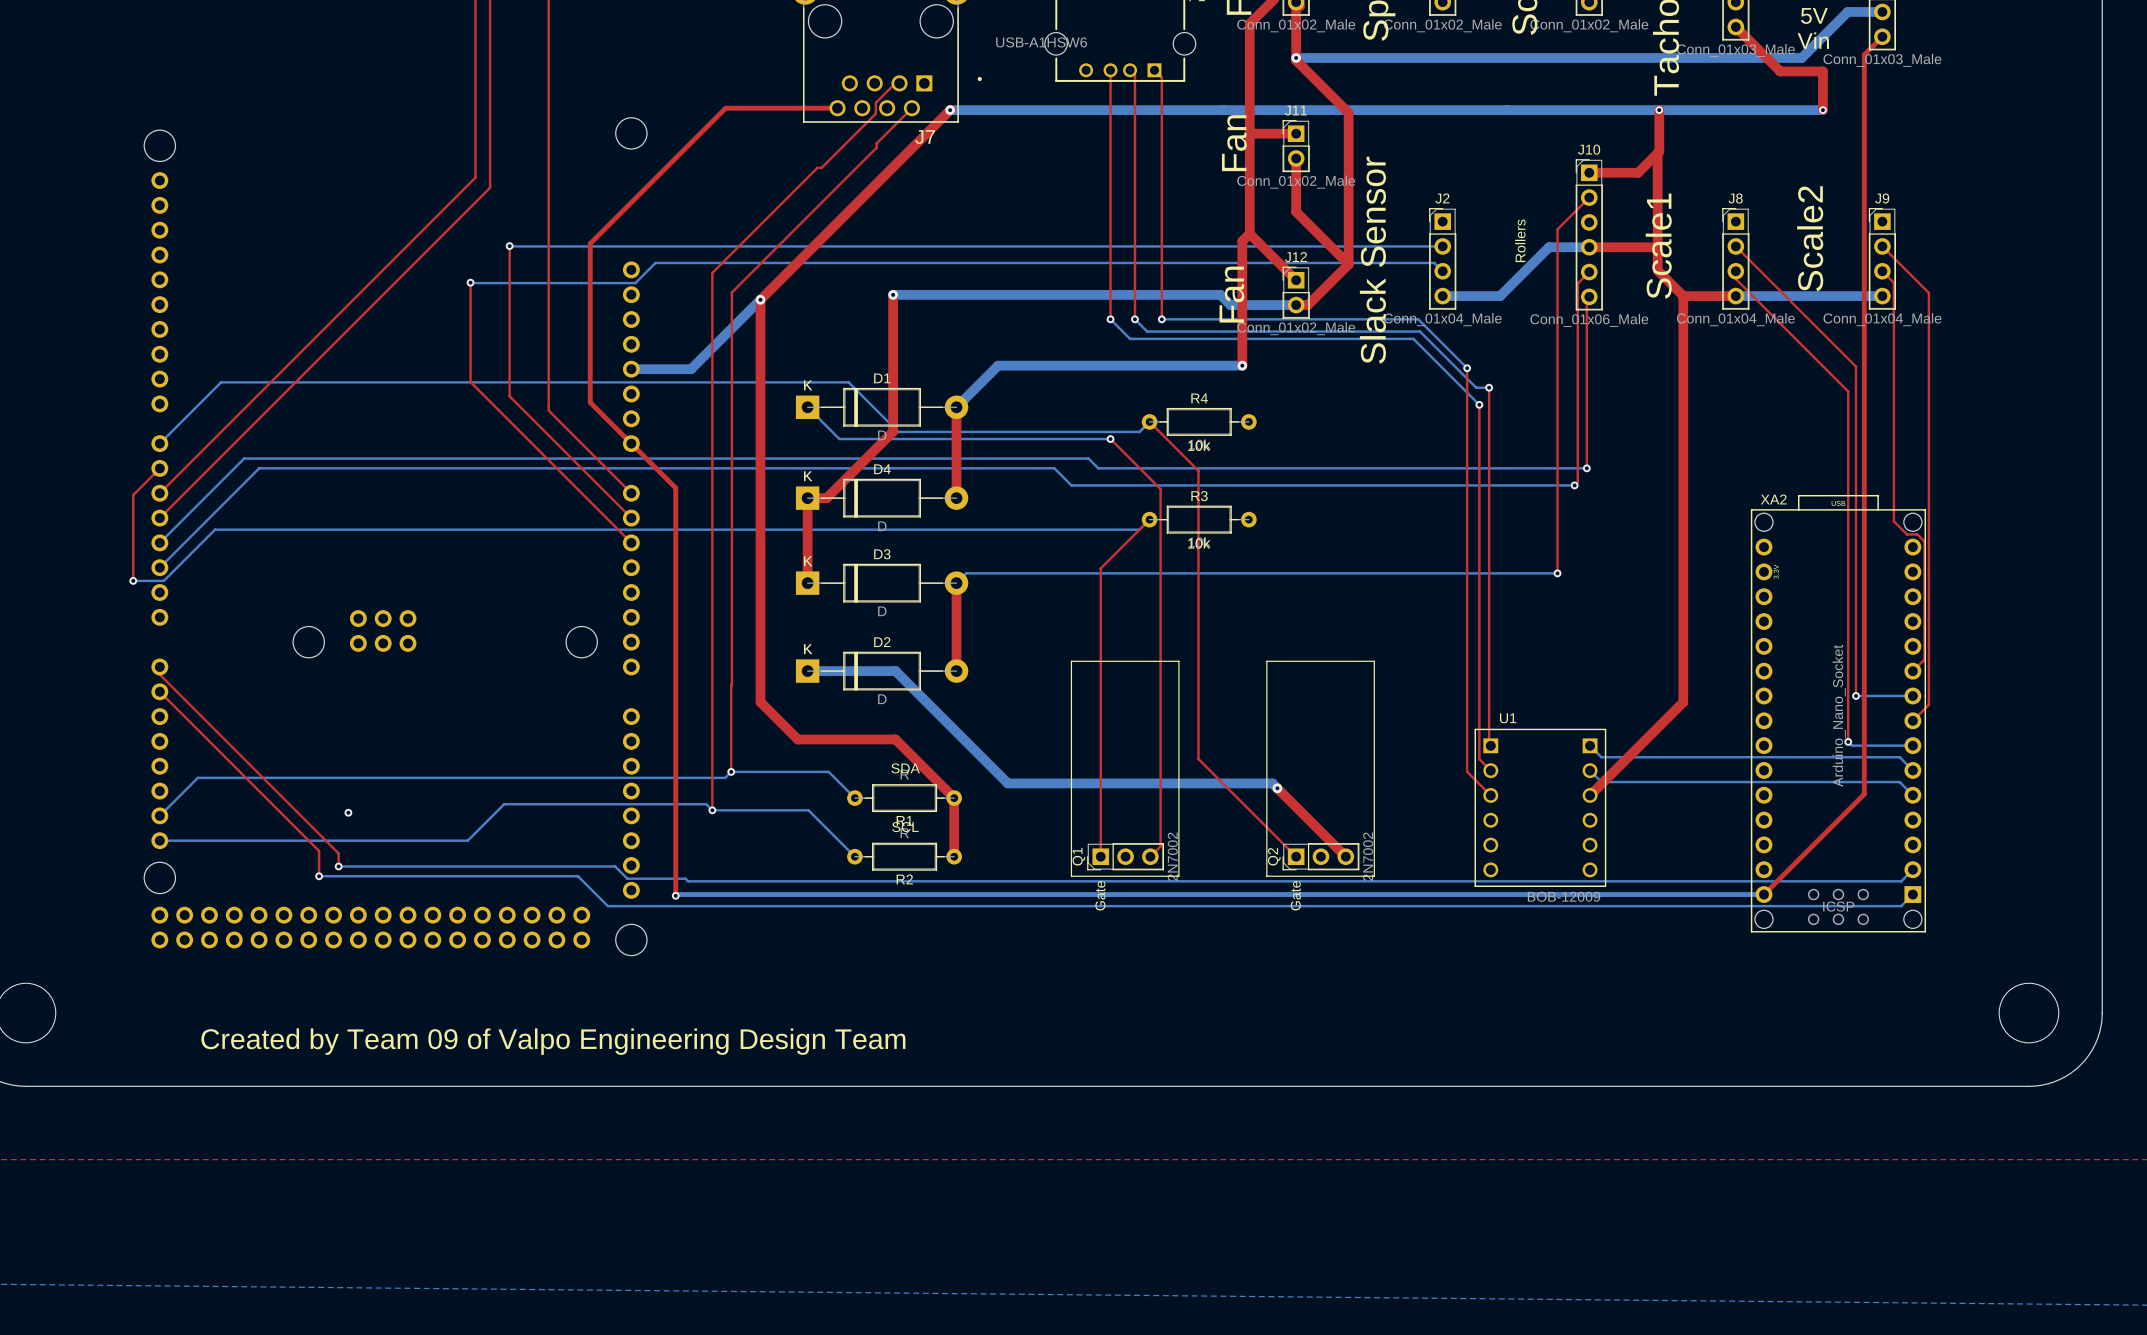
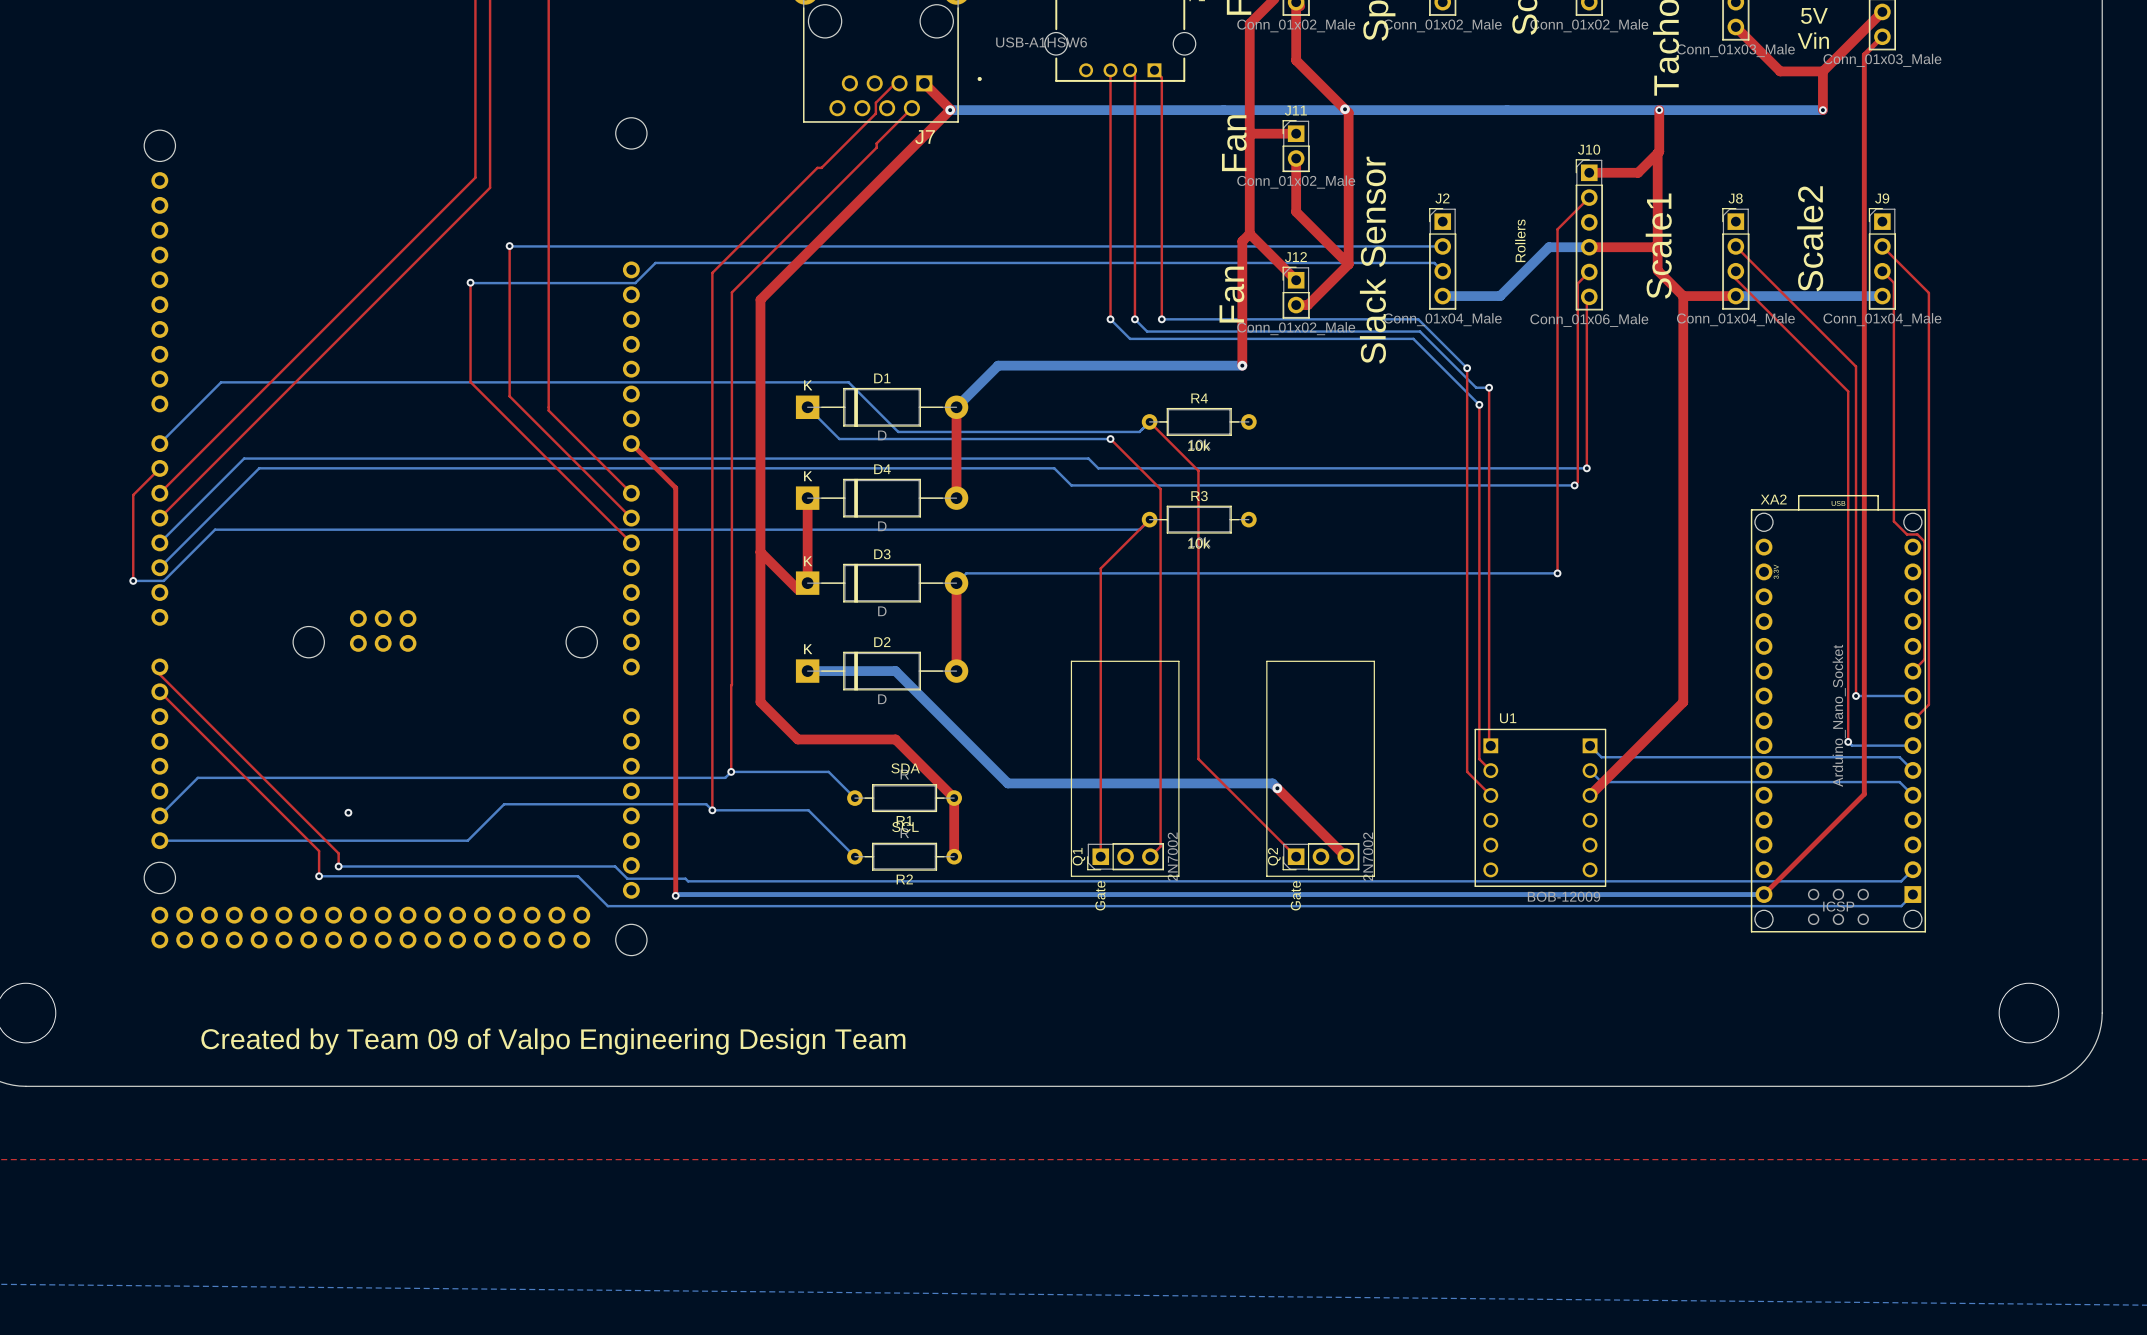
top track: none -> (1882, 11) (1822, 71)
bottom track: (1882, 11) (1847, 11) (1801, 57) (1296, 57) -> none
via: (1296, 57) -> none
top track: none -> (924, 83) (950, 109)
top track: (837, 108) (725, 108) (590, 243) (590, 402) (631, 443) -> none
via: none -> (1345, 109)
top track: (893, 294) (893, 431) (826, 498) (807, 498) -> none
bottom track: (893, 294) (1220, 294) (1230, 305) (1296, 305) -> none
via: (893, 294) -> none
bottom track: (760, 299) (691, 369) (631, 369) -> none
via: (760, 299) -> none
top track: none -> (760, 552) (797, 589)

